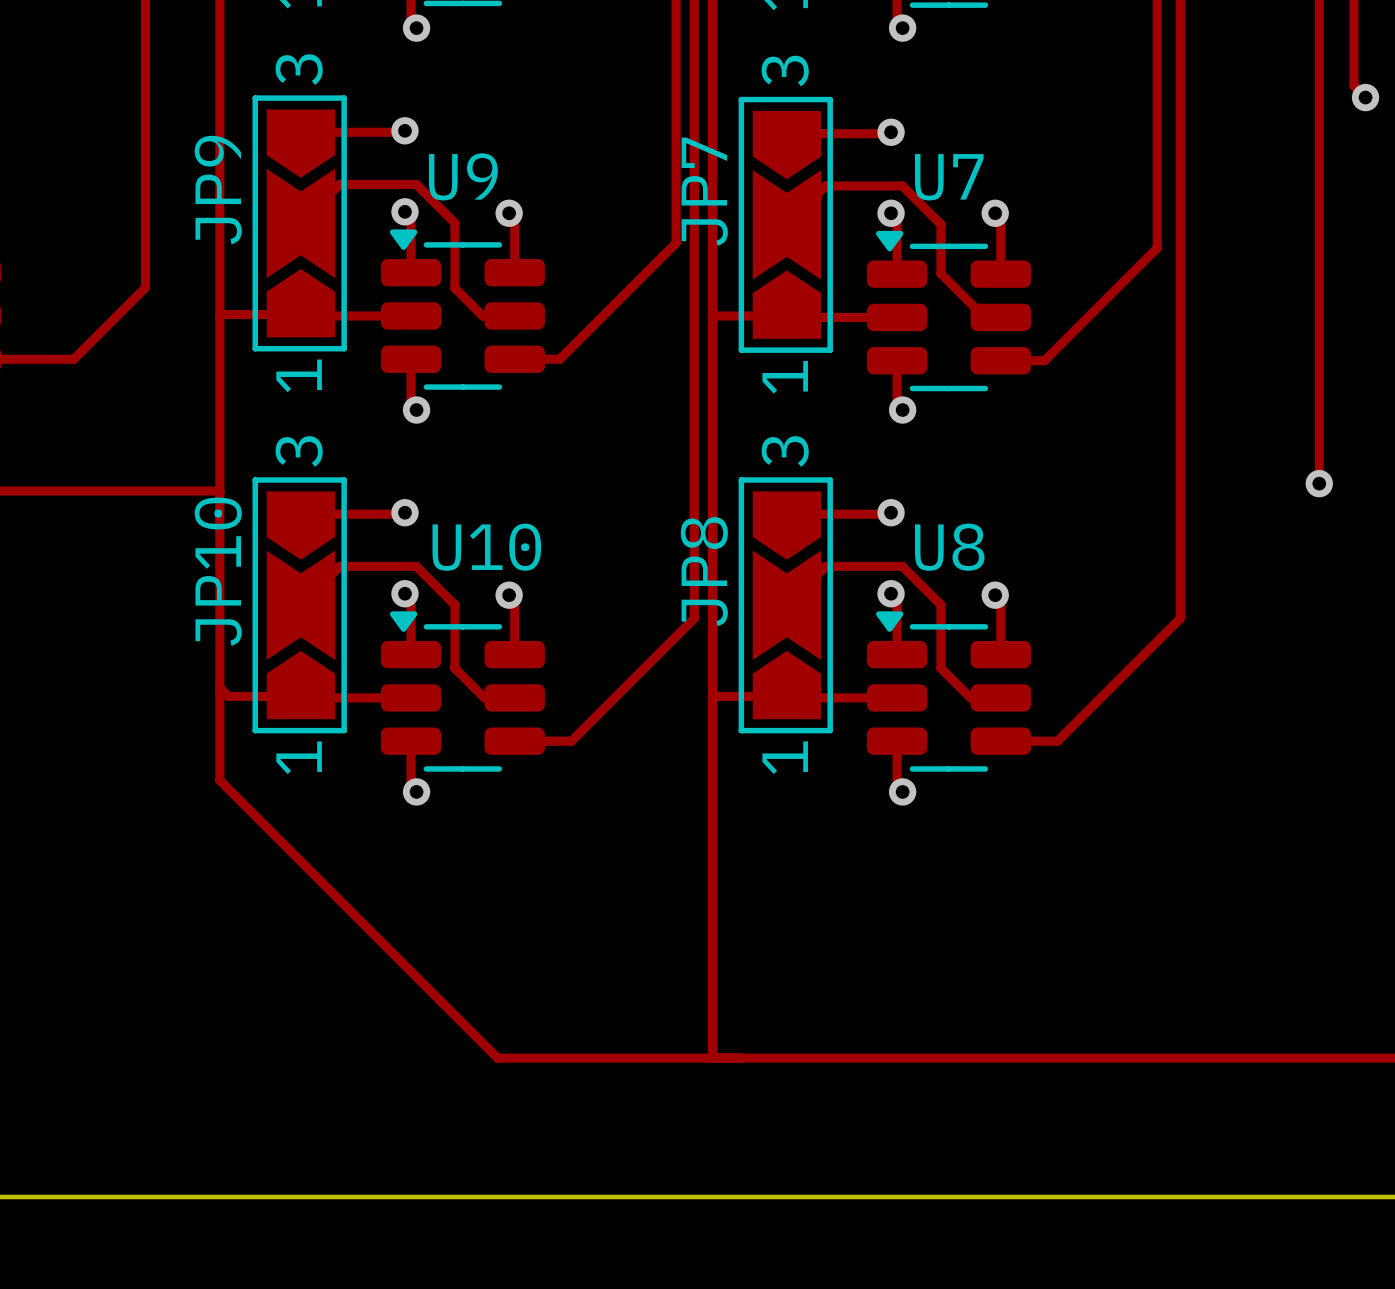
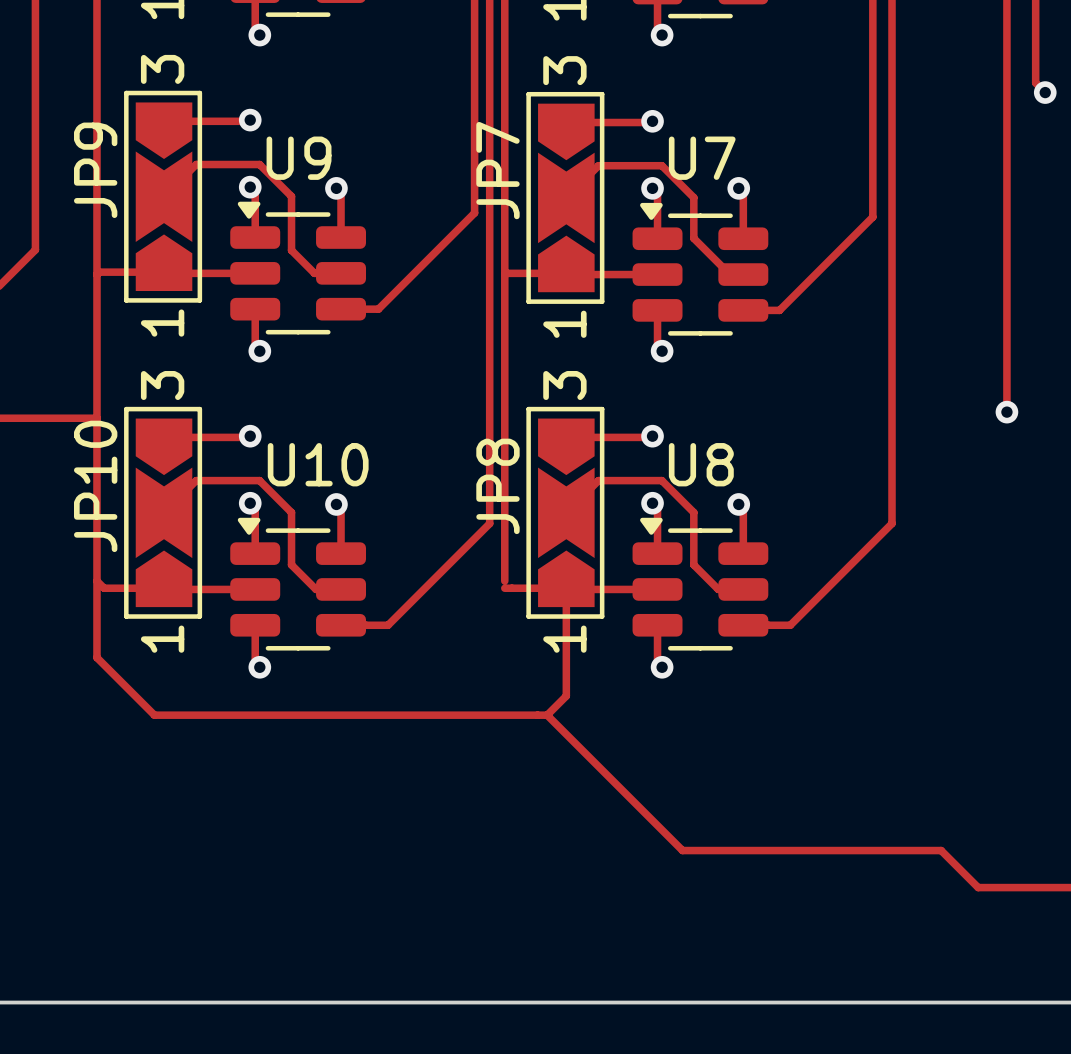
track: (712, 687) (712, 1058) -> none
track: none -> (566, 588) (566, 696) (547, 715)
track: (289, 849) (497, 1058) (1284, 1058) -> (547, 715) (682, 850) (941, 850) (978, 887)
track: none -> (154, 715) (547, 715)

